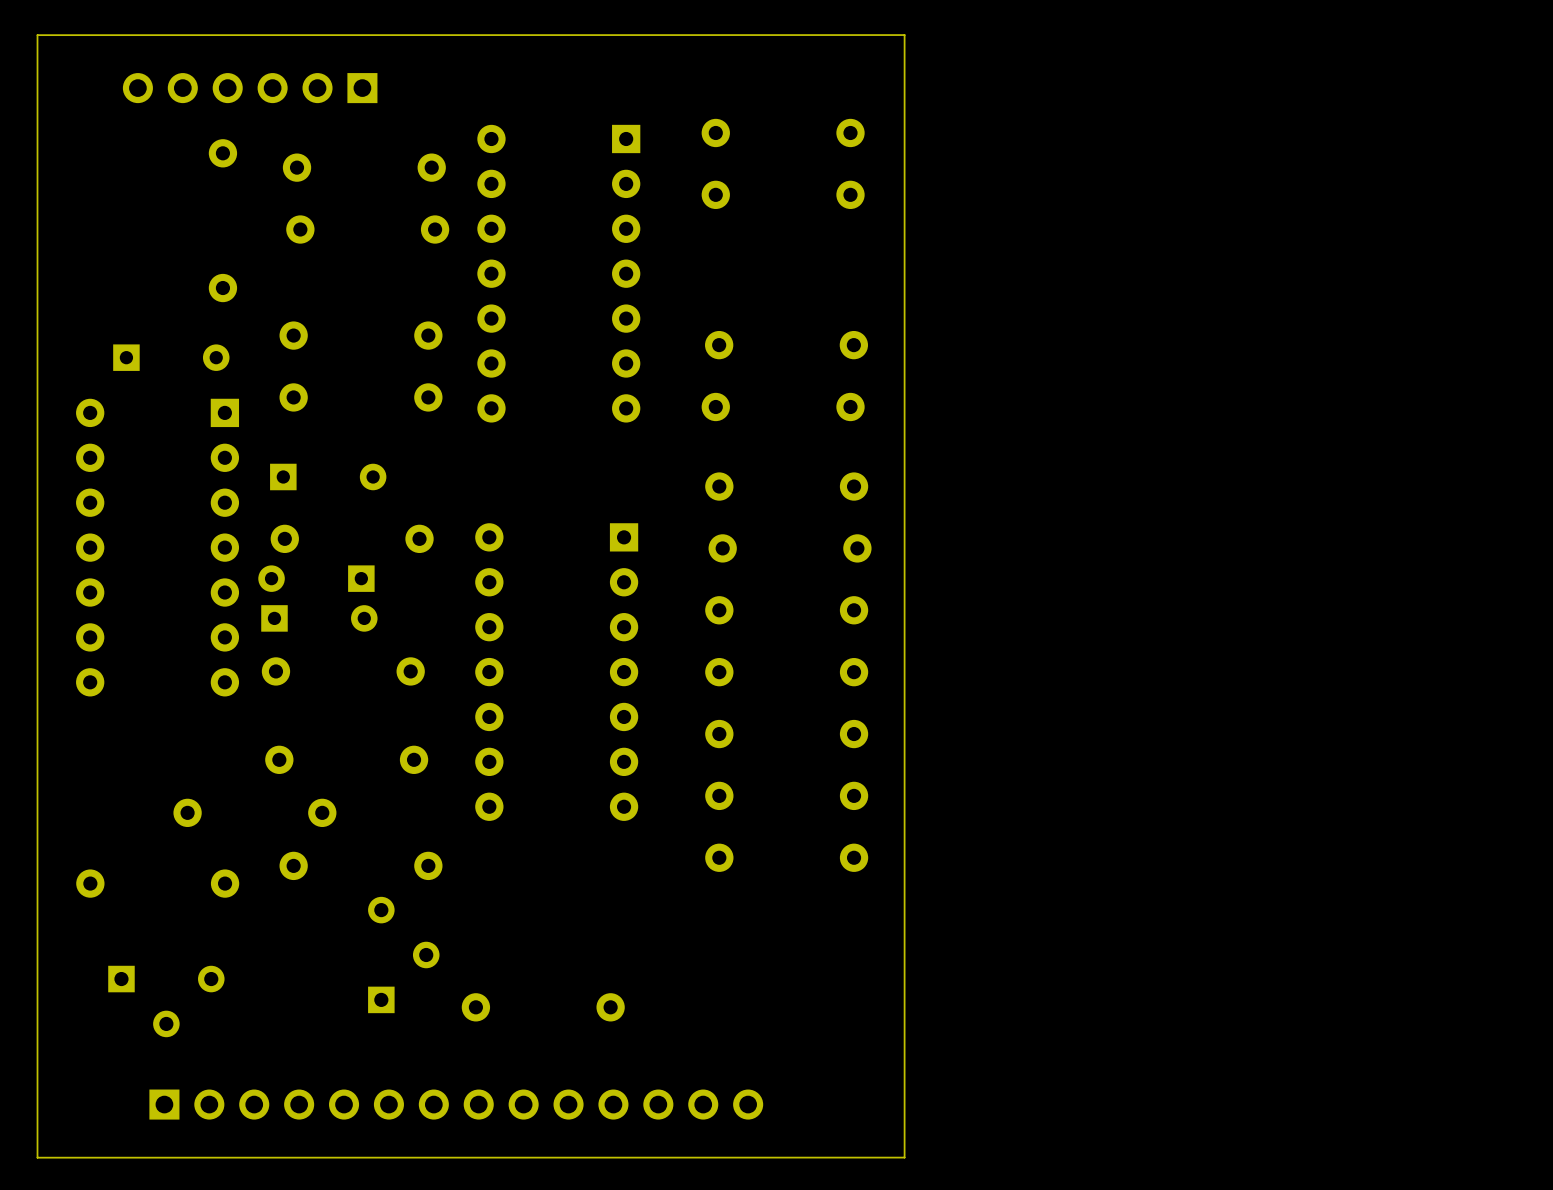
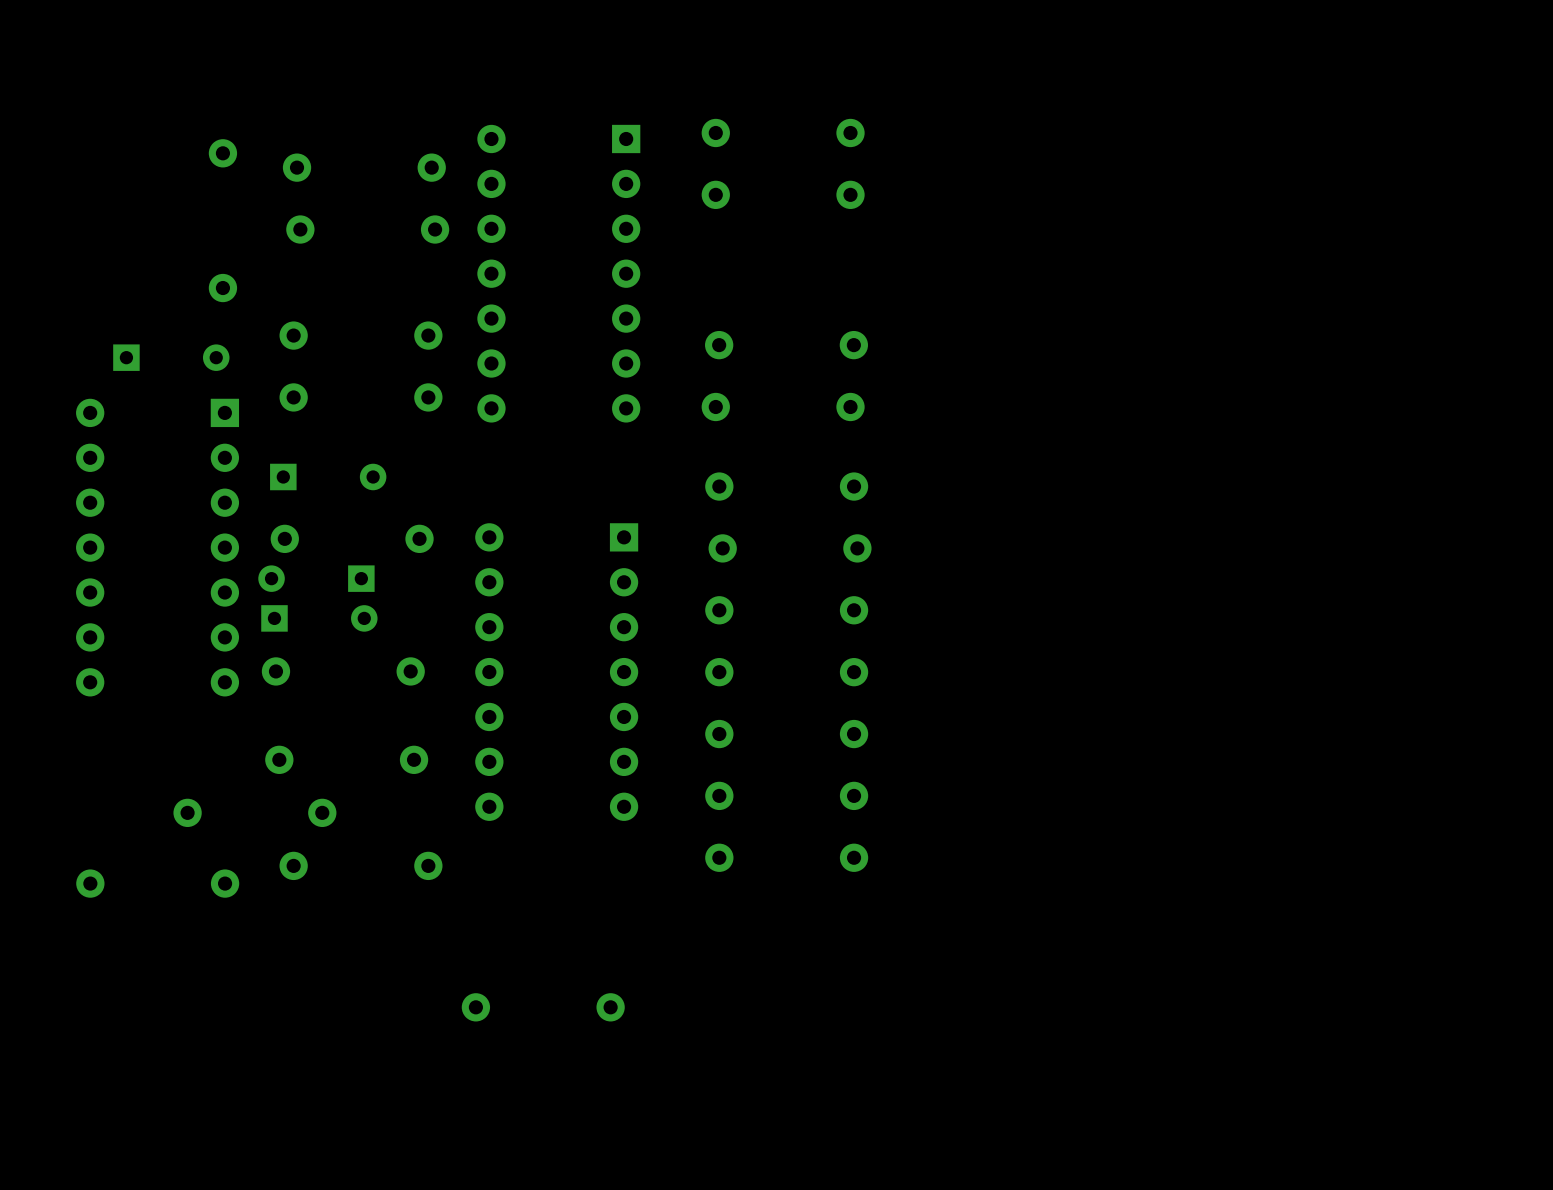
board edge: (904, 35) (904, 1157) (37, 1157) (37, 35) (904, 35) -> none
part: (250, 88) -> none
part: (403, 955) -> none
part: (166, 1001) -> none
part: (456, 1104) -> none

